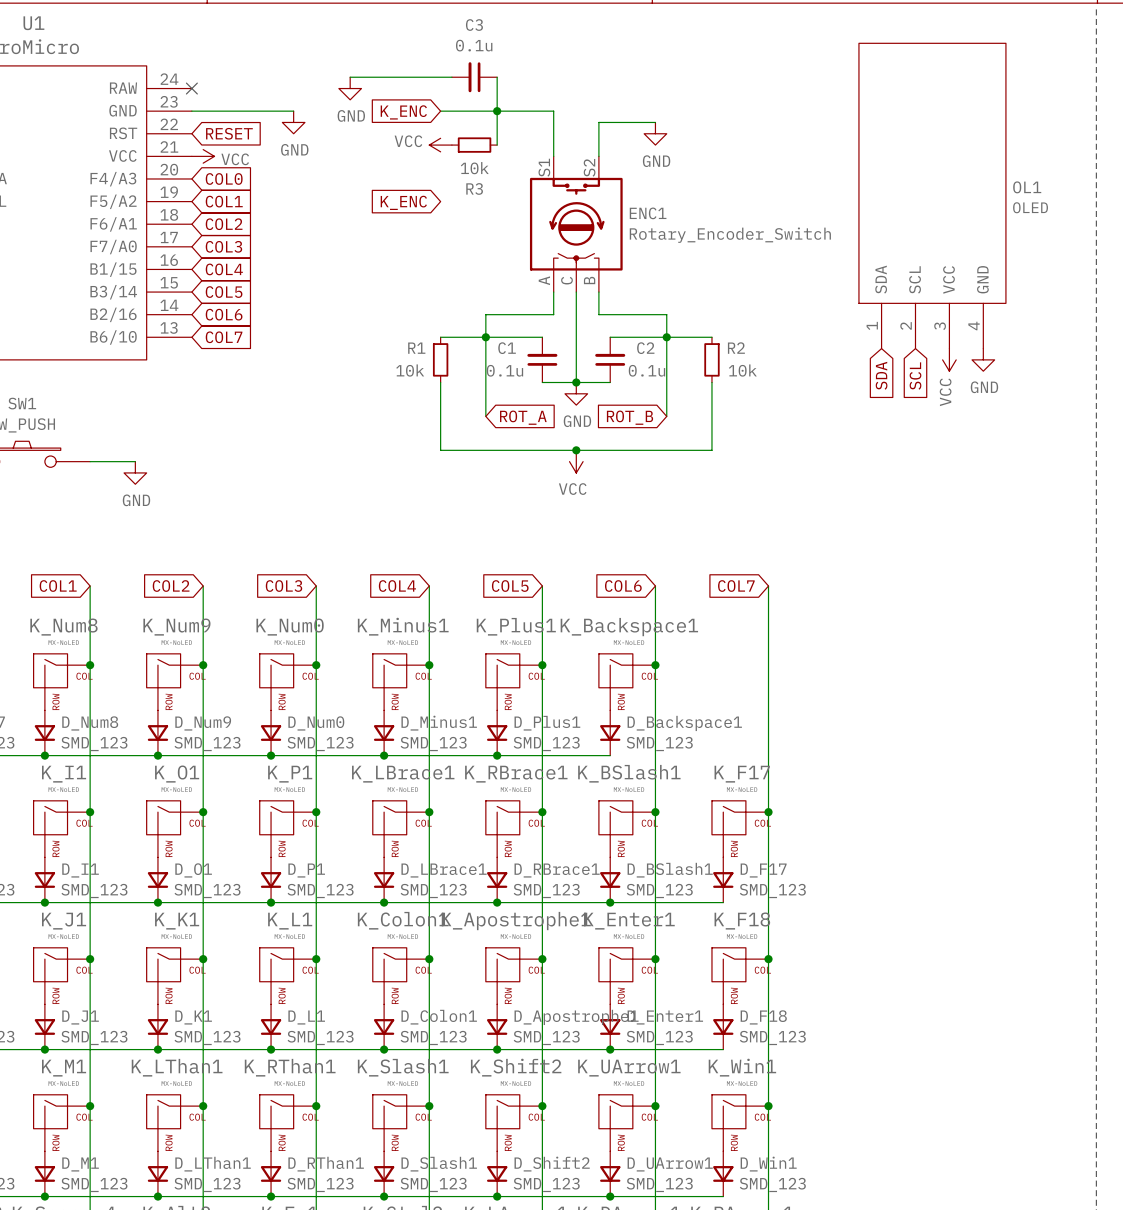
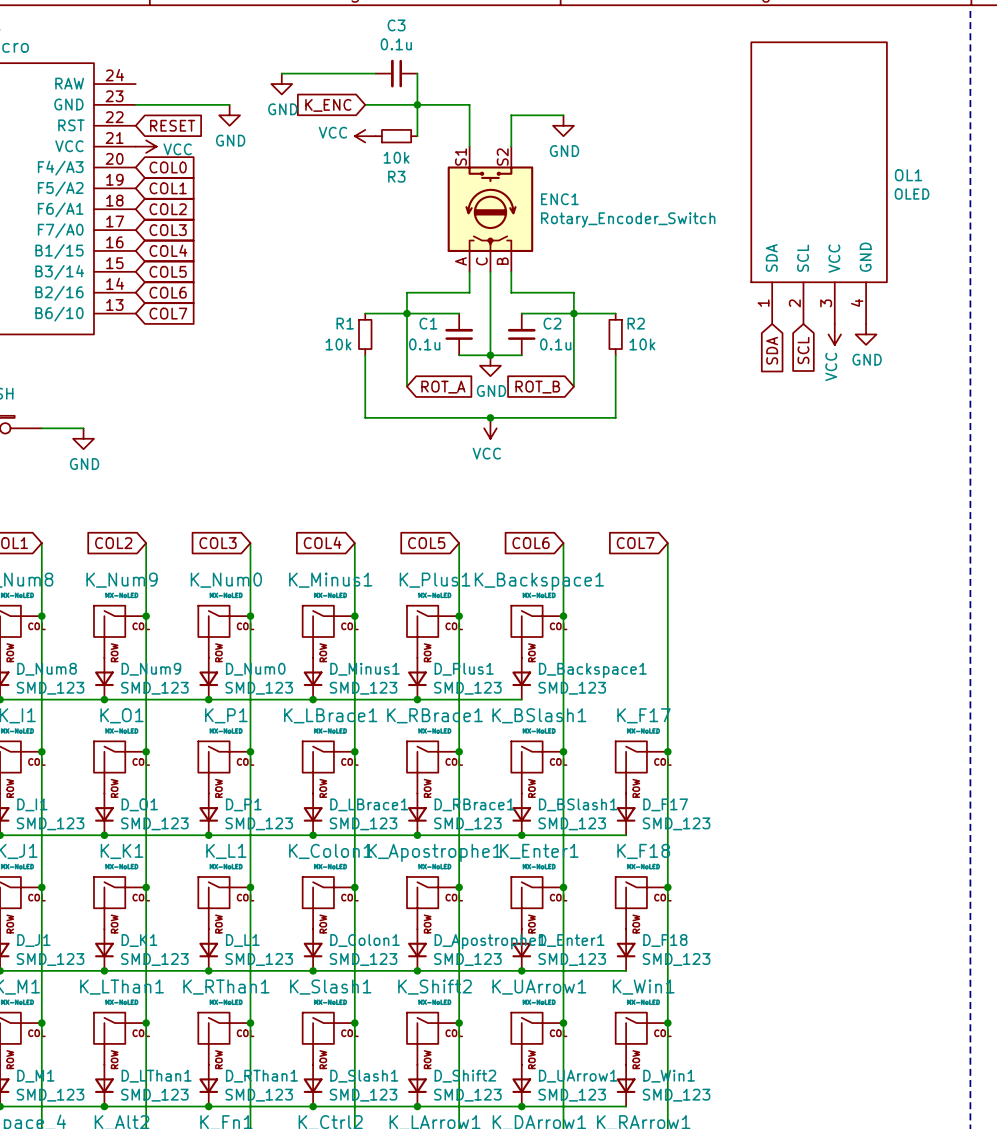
no-connect mark: (191, 88) -> none
global label: K_ENC (403, 202) -> none

